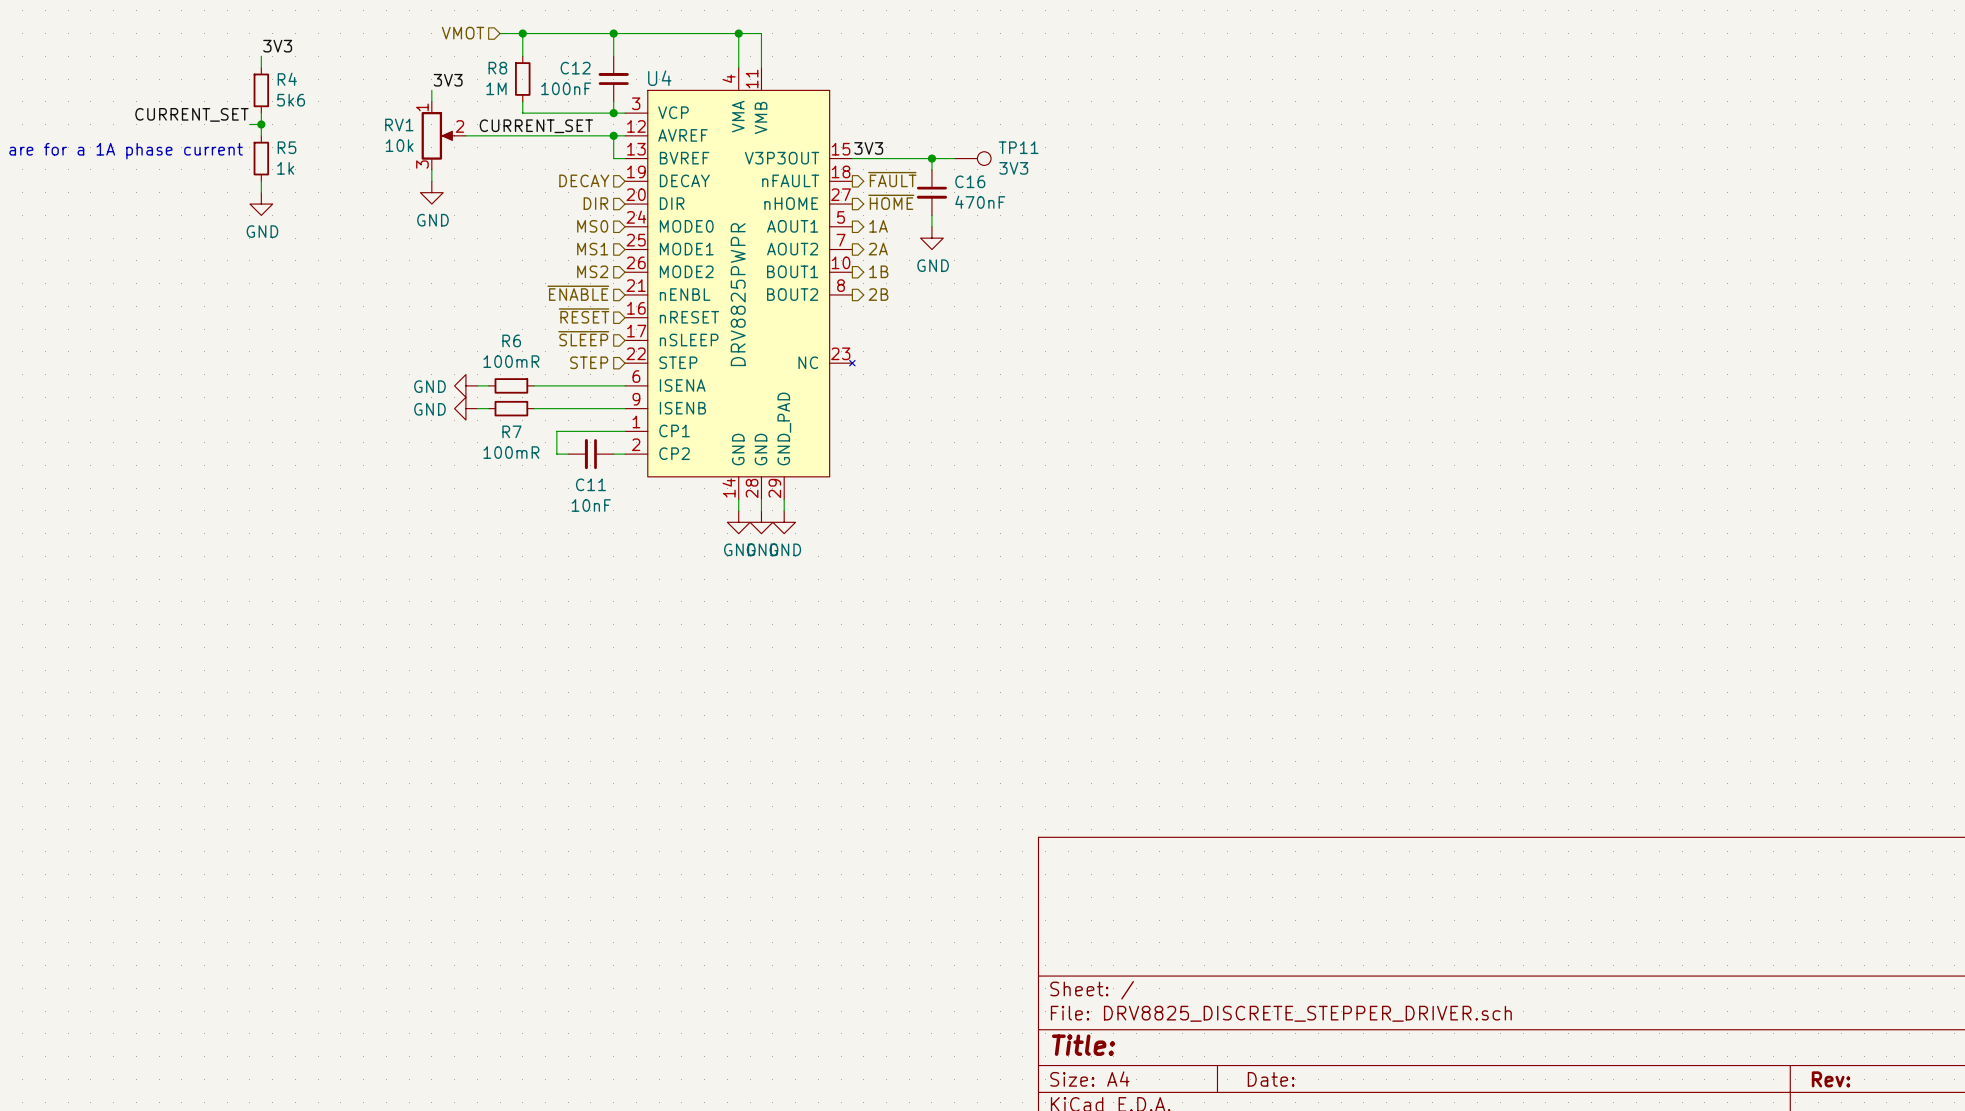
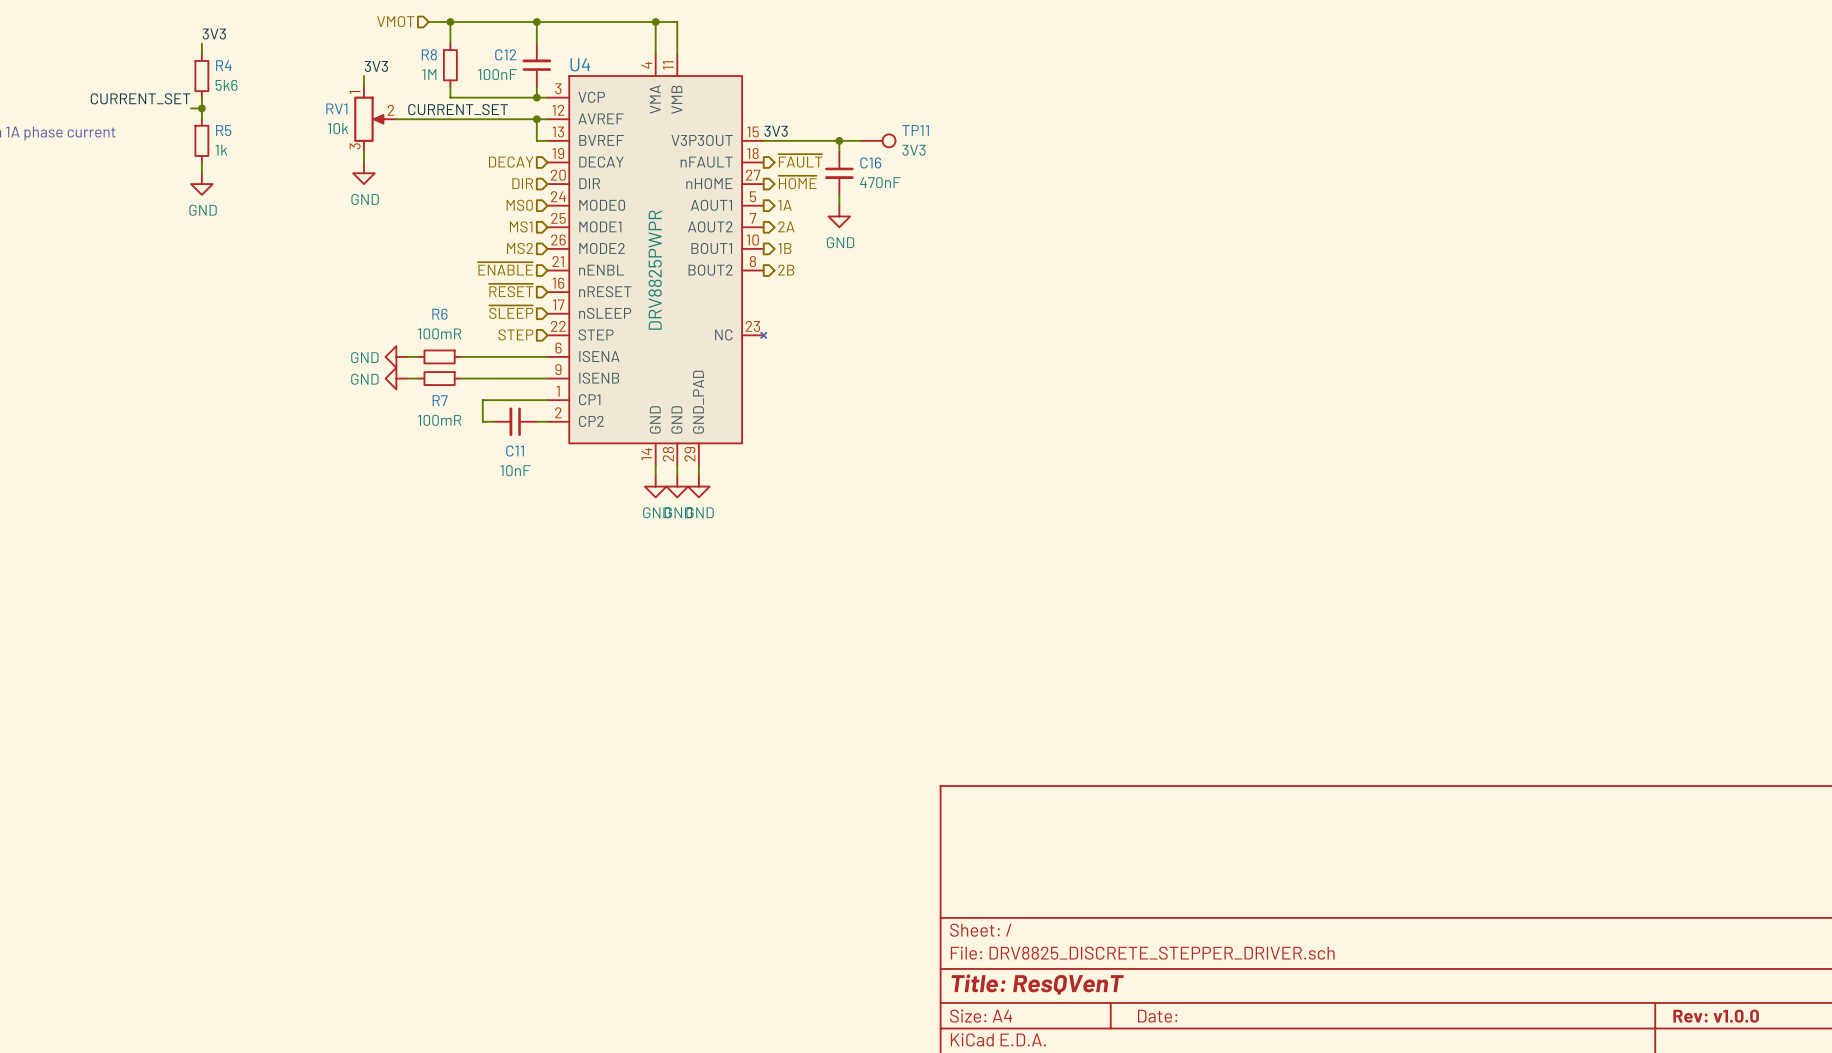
title block: Title: (1083, 1045) -> Title: ResQVenT (1037, 984)
title block: Rev: (1831, 1079) -> Rev: v1.0.0 (1716, 1016)

